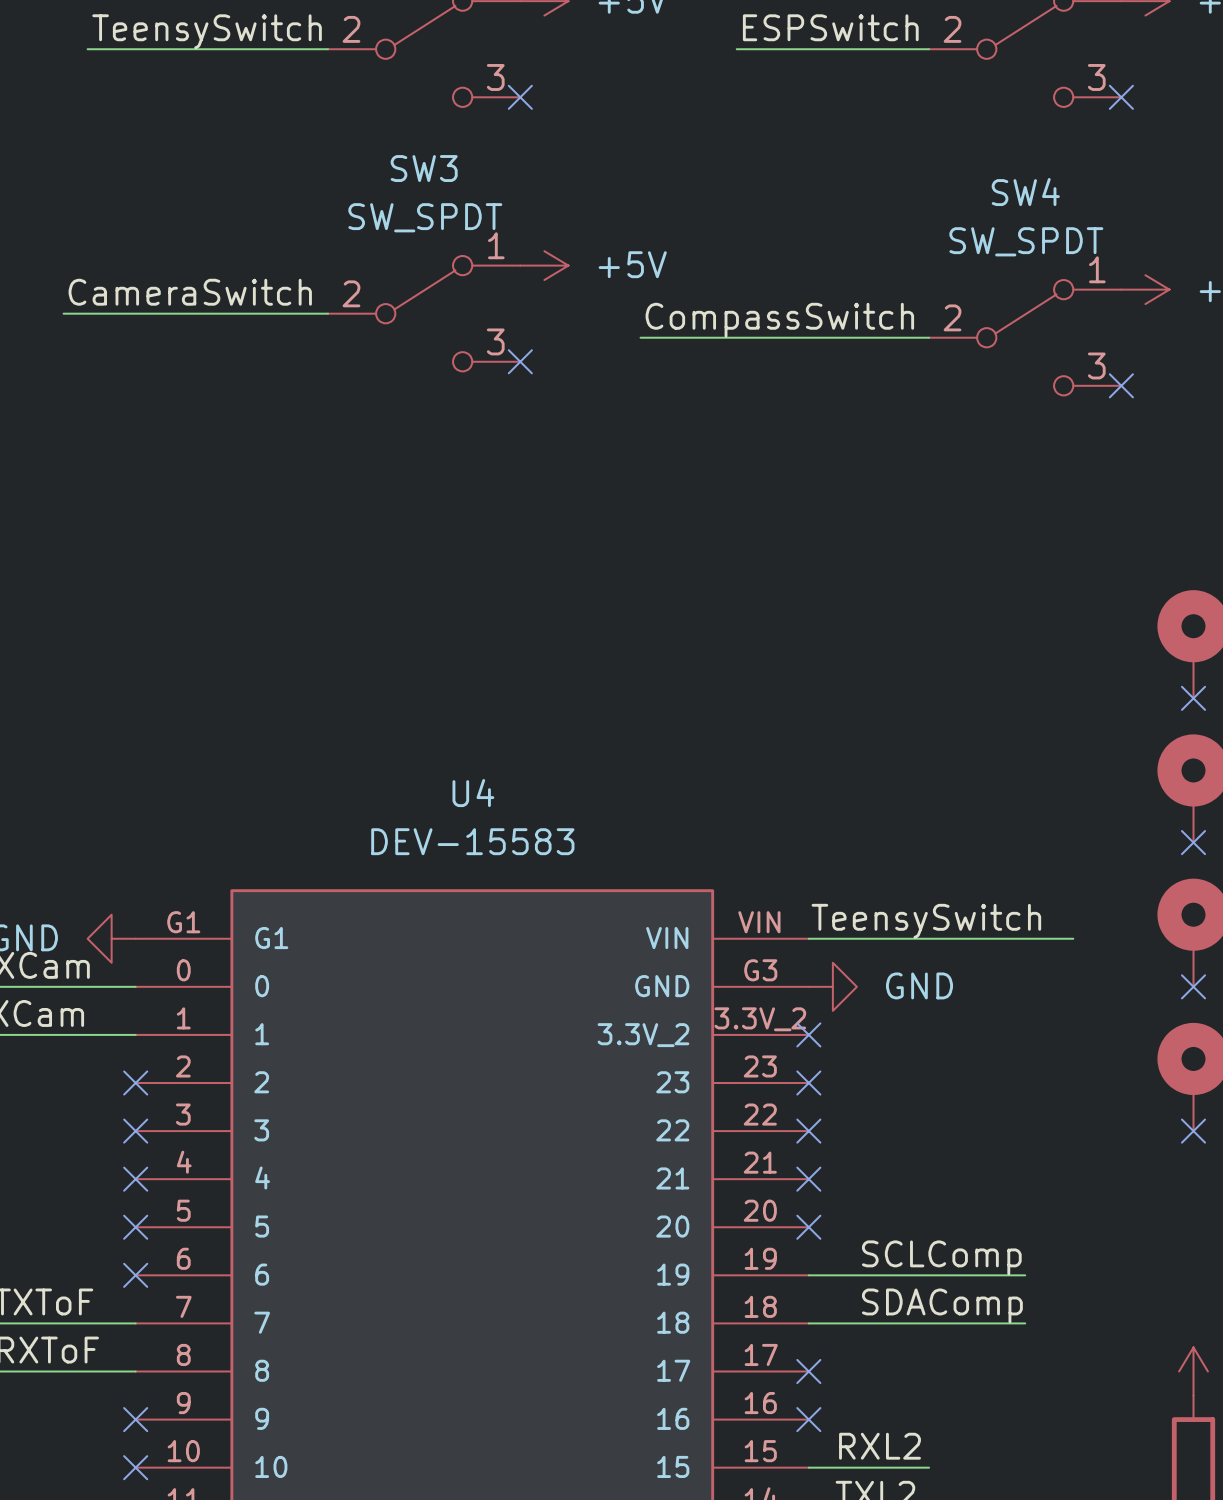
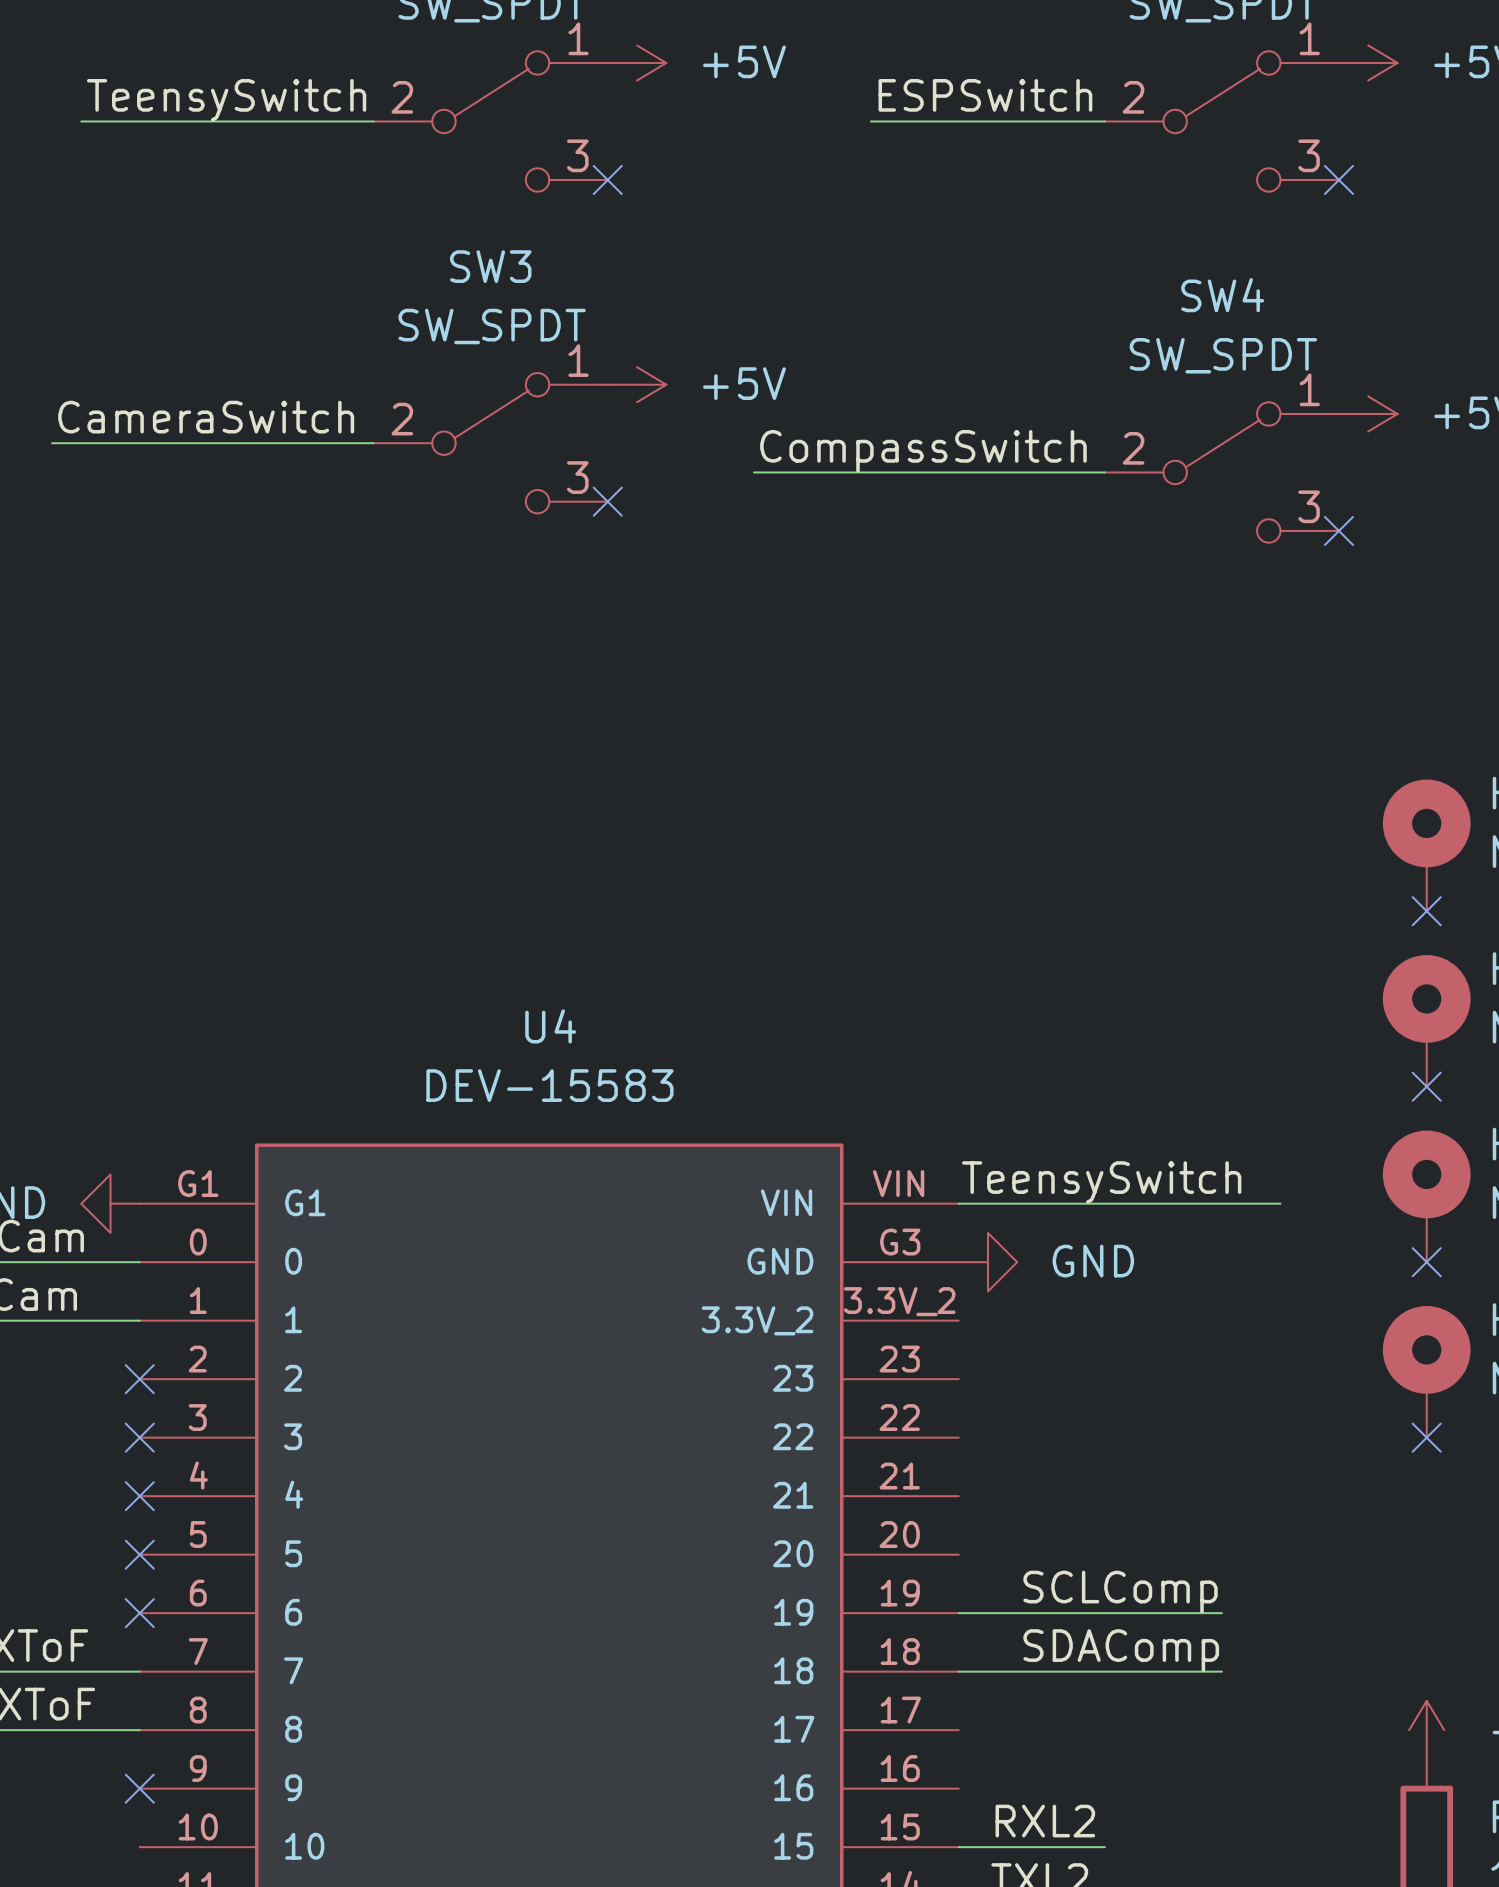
no-connect mark: (808, 1034) -> none
no-connect mark: (808, 1083) -> none
no-connect mark: (808, 1131) -> none
no-connect mark: (808, 1179) -> none
no-connect mark: (808, 1227) -> none
no-connect mark: (808, 1371) -> none
no-connect mark: (808, 1419) -> none
no-connect mark: (135, 1467) -> none

